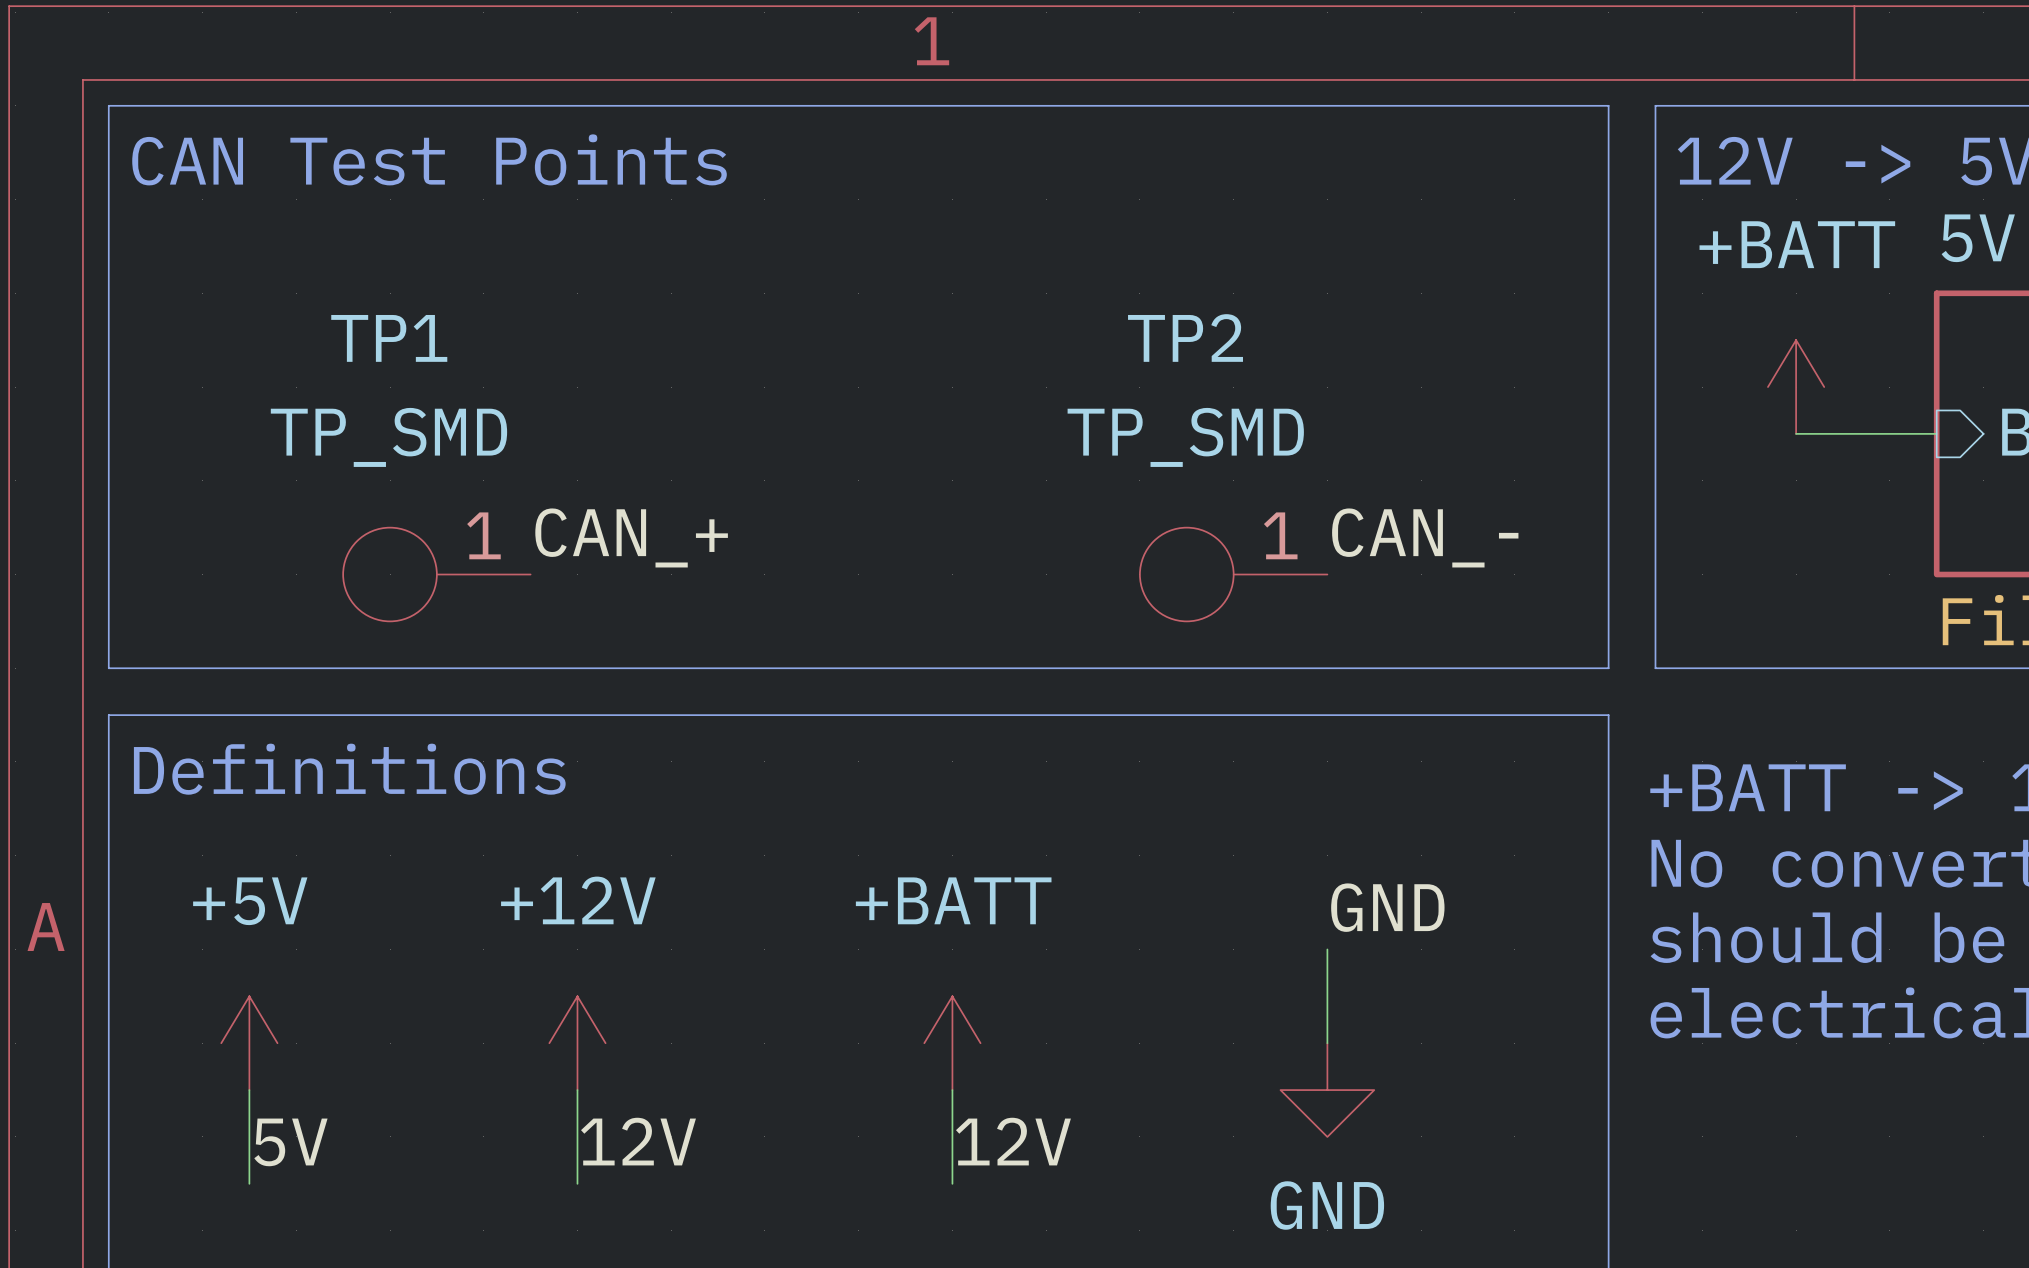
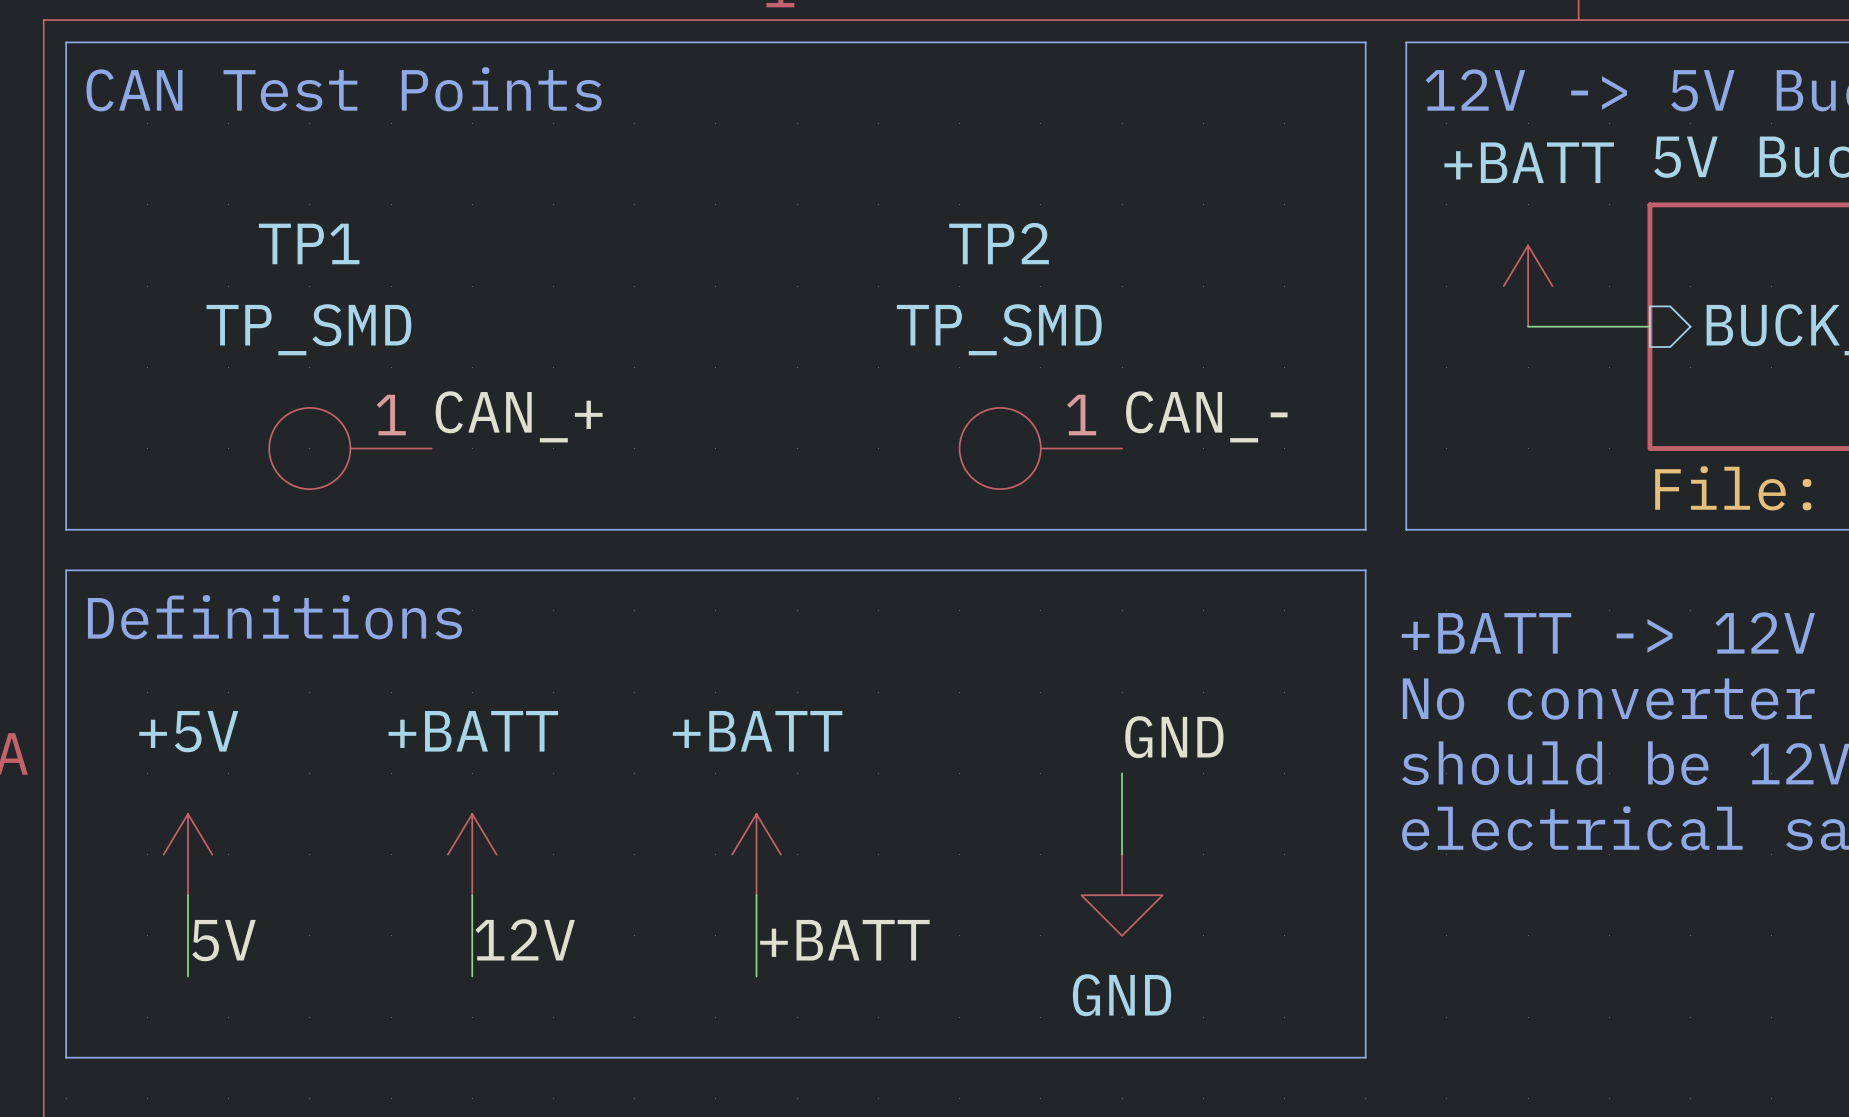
power symbol: +12V (577, 1043) -> +BATT (472, 854)
power symbol position: +BATT (952, 1043) -> +BATT (756, 854)
wire: (952, 1090) (952, 1183) -> (756, 895) (756, 976)
label: none -> +BATT (844, 940)
label: 12V (1013, 1141) -> none

